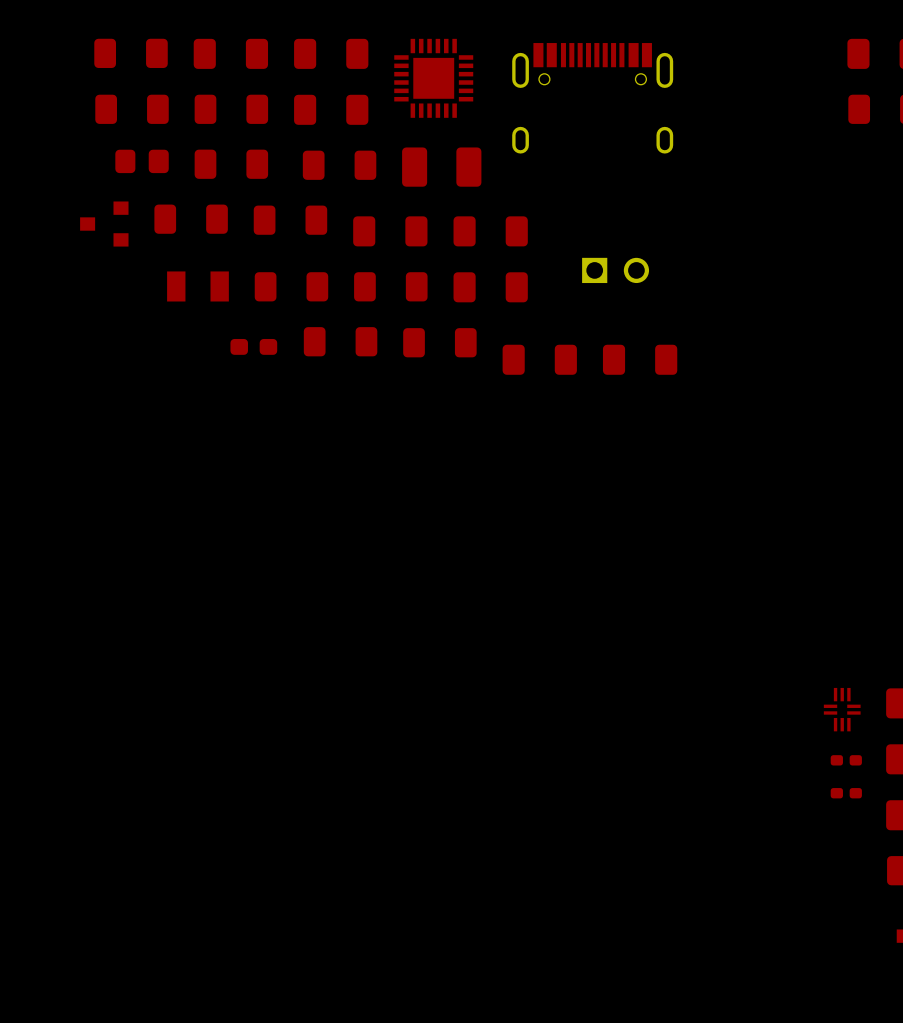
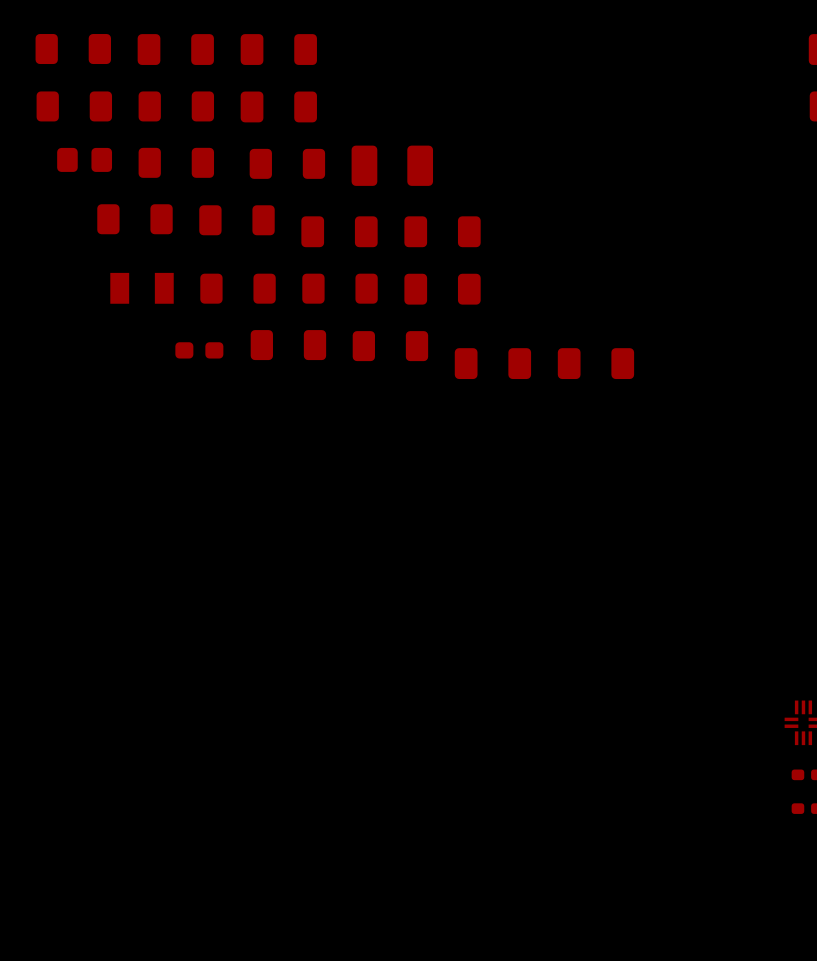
part: (433, 78) -> none
part: (592, 98) -> none
part: (104, 224) -> none
part: (615, 270) -> none

